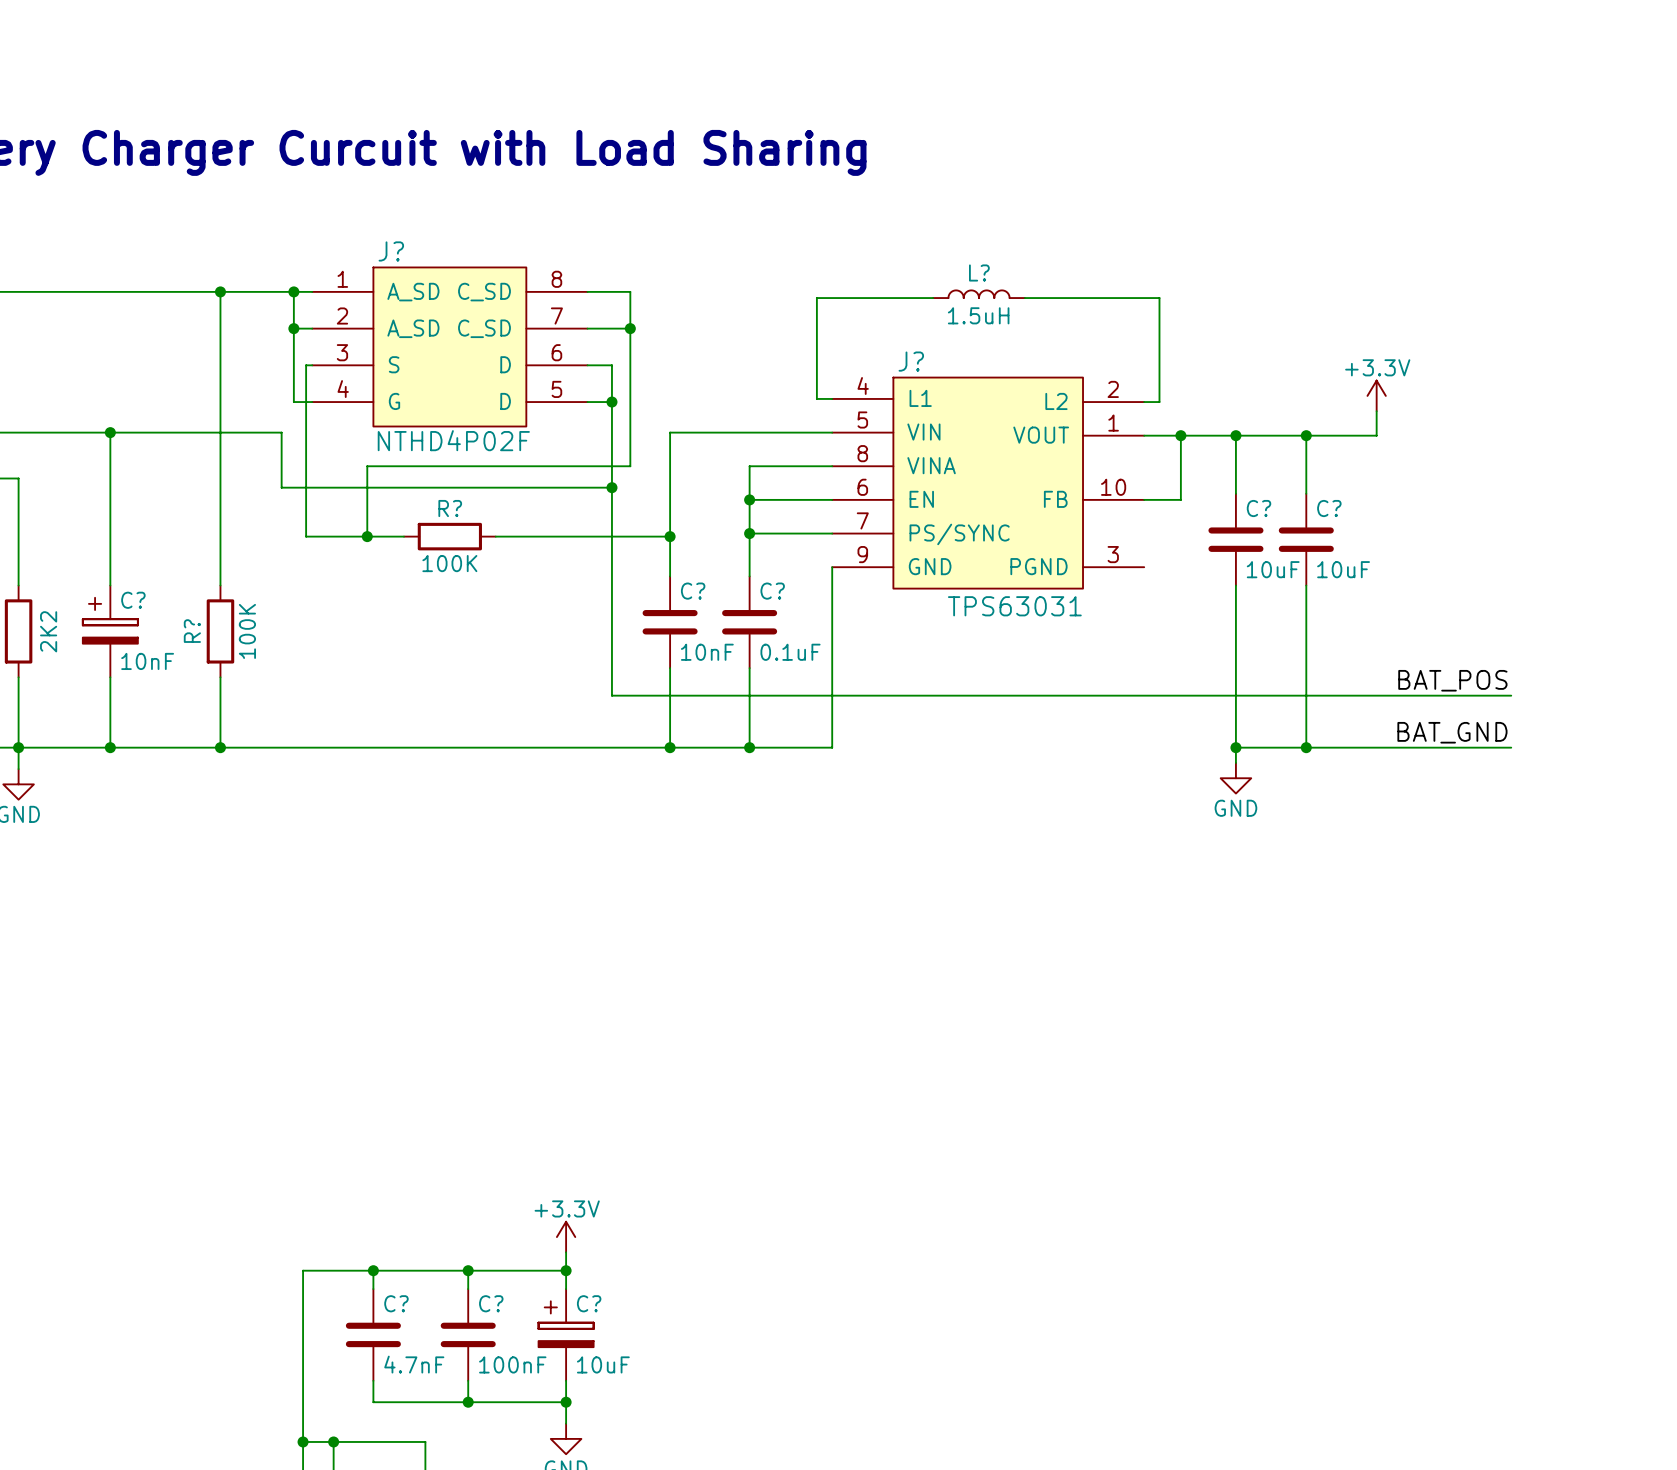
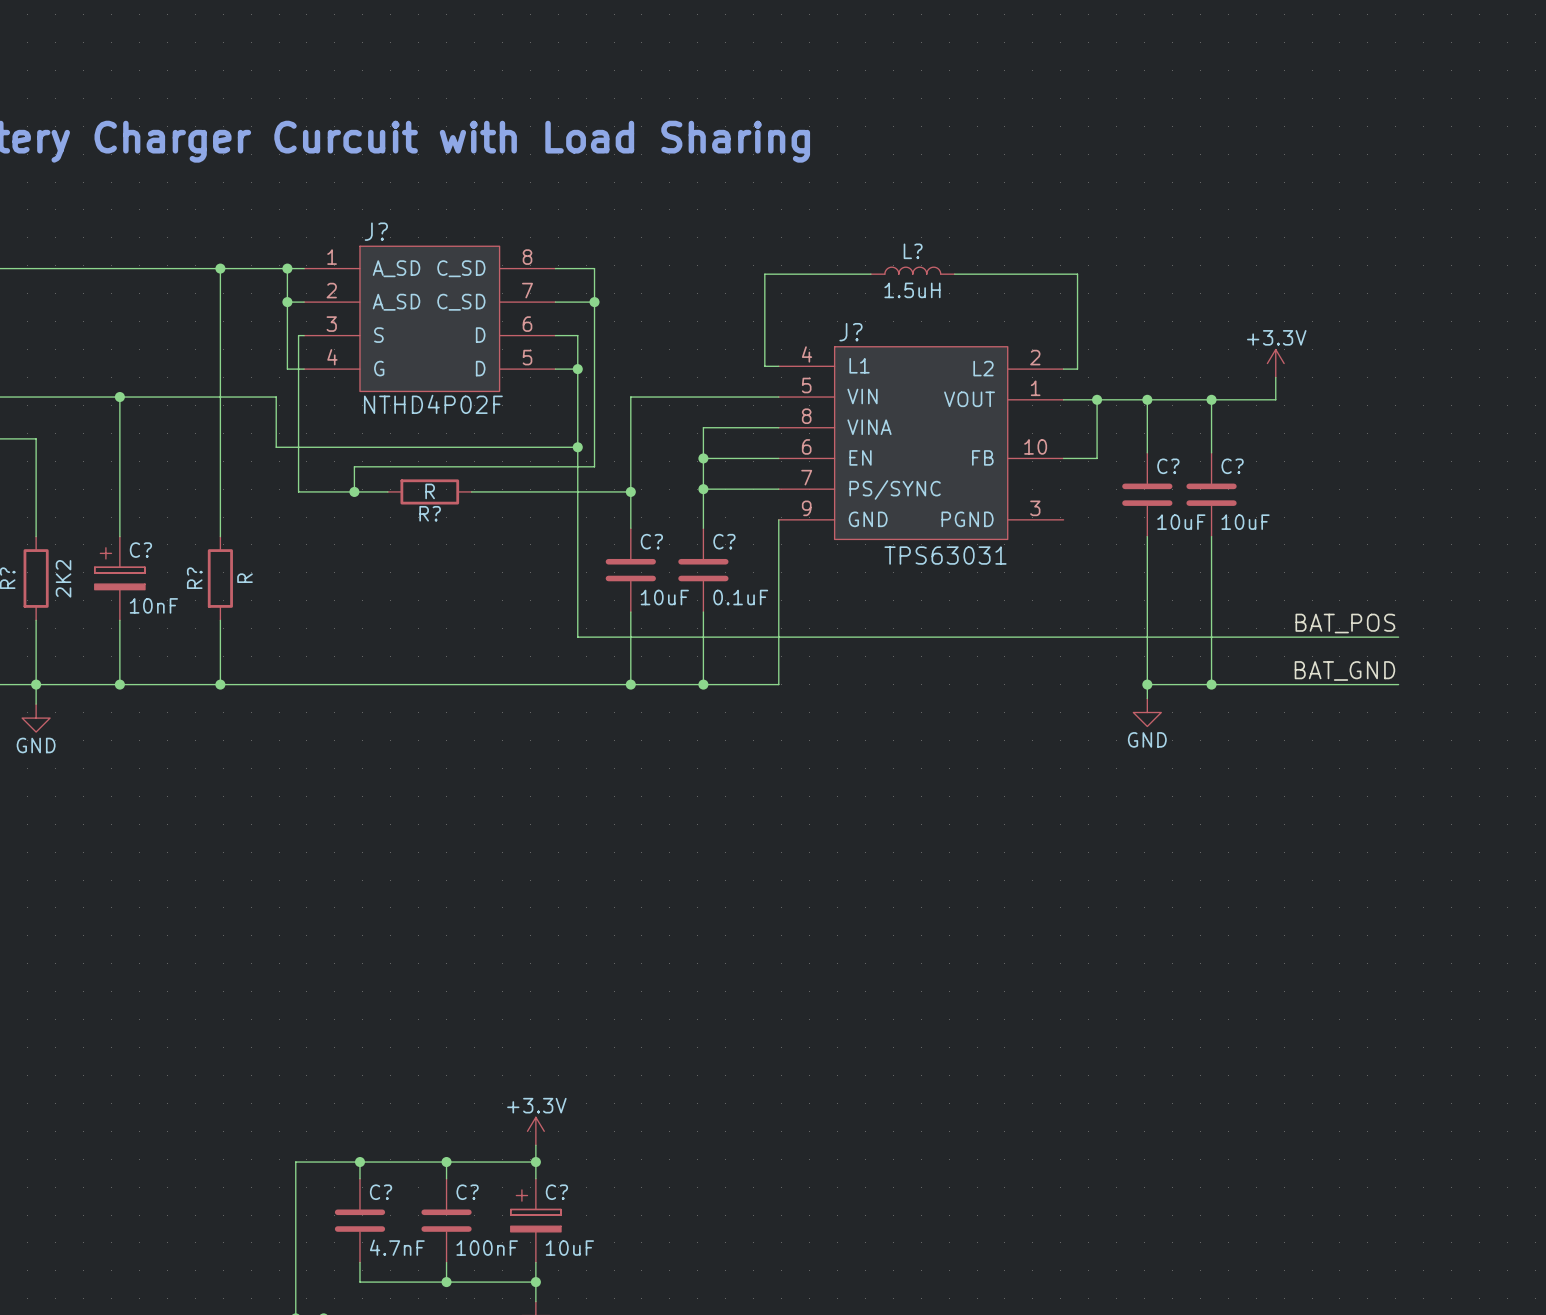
wire: (630, 466) (367, 466) (367, 509) -> (594, 427) (594, 466) (354, 466)
R? name position: R? (450, 508) -> R? (430, 513)
R? value: 100K (449, 563) -> R (430, 491)
R? value: 100K (247, 631) -> R (244, 578)
C? value: 10nF (707, 652) -> 10uF (664, 597)

